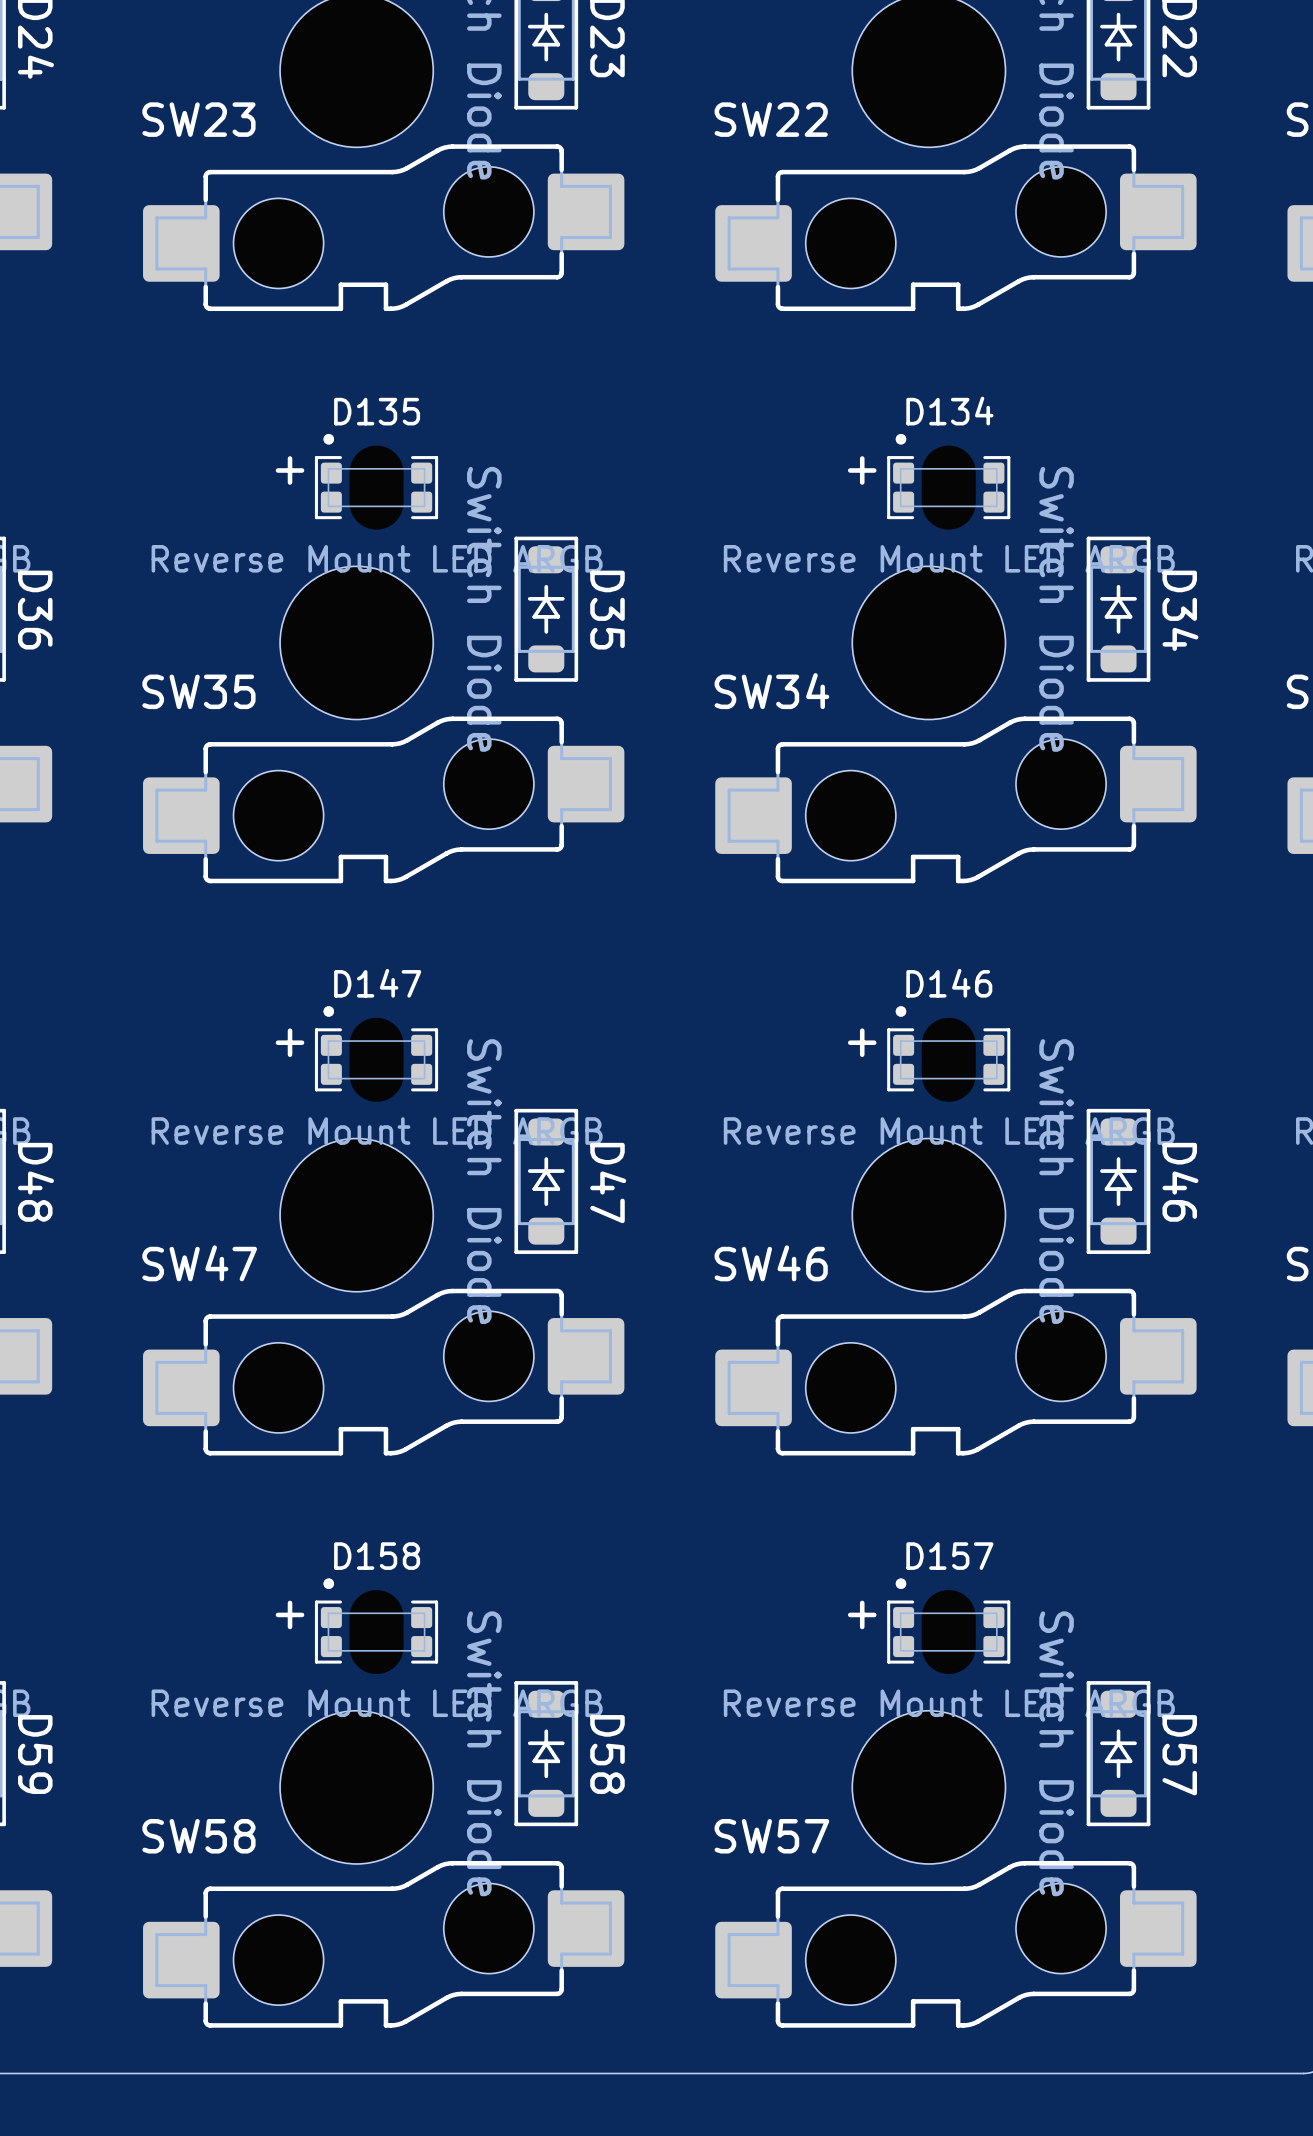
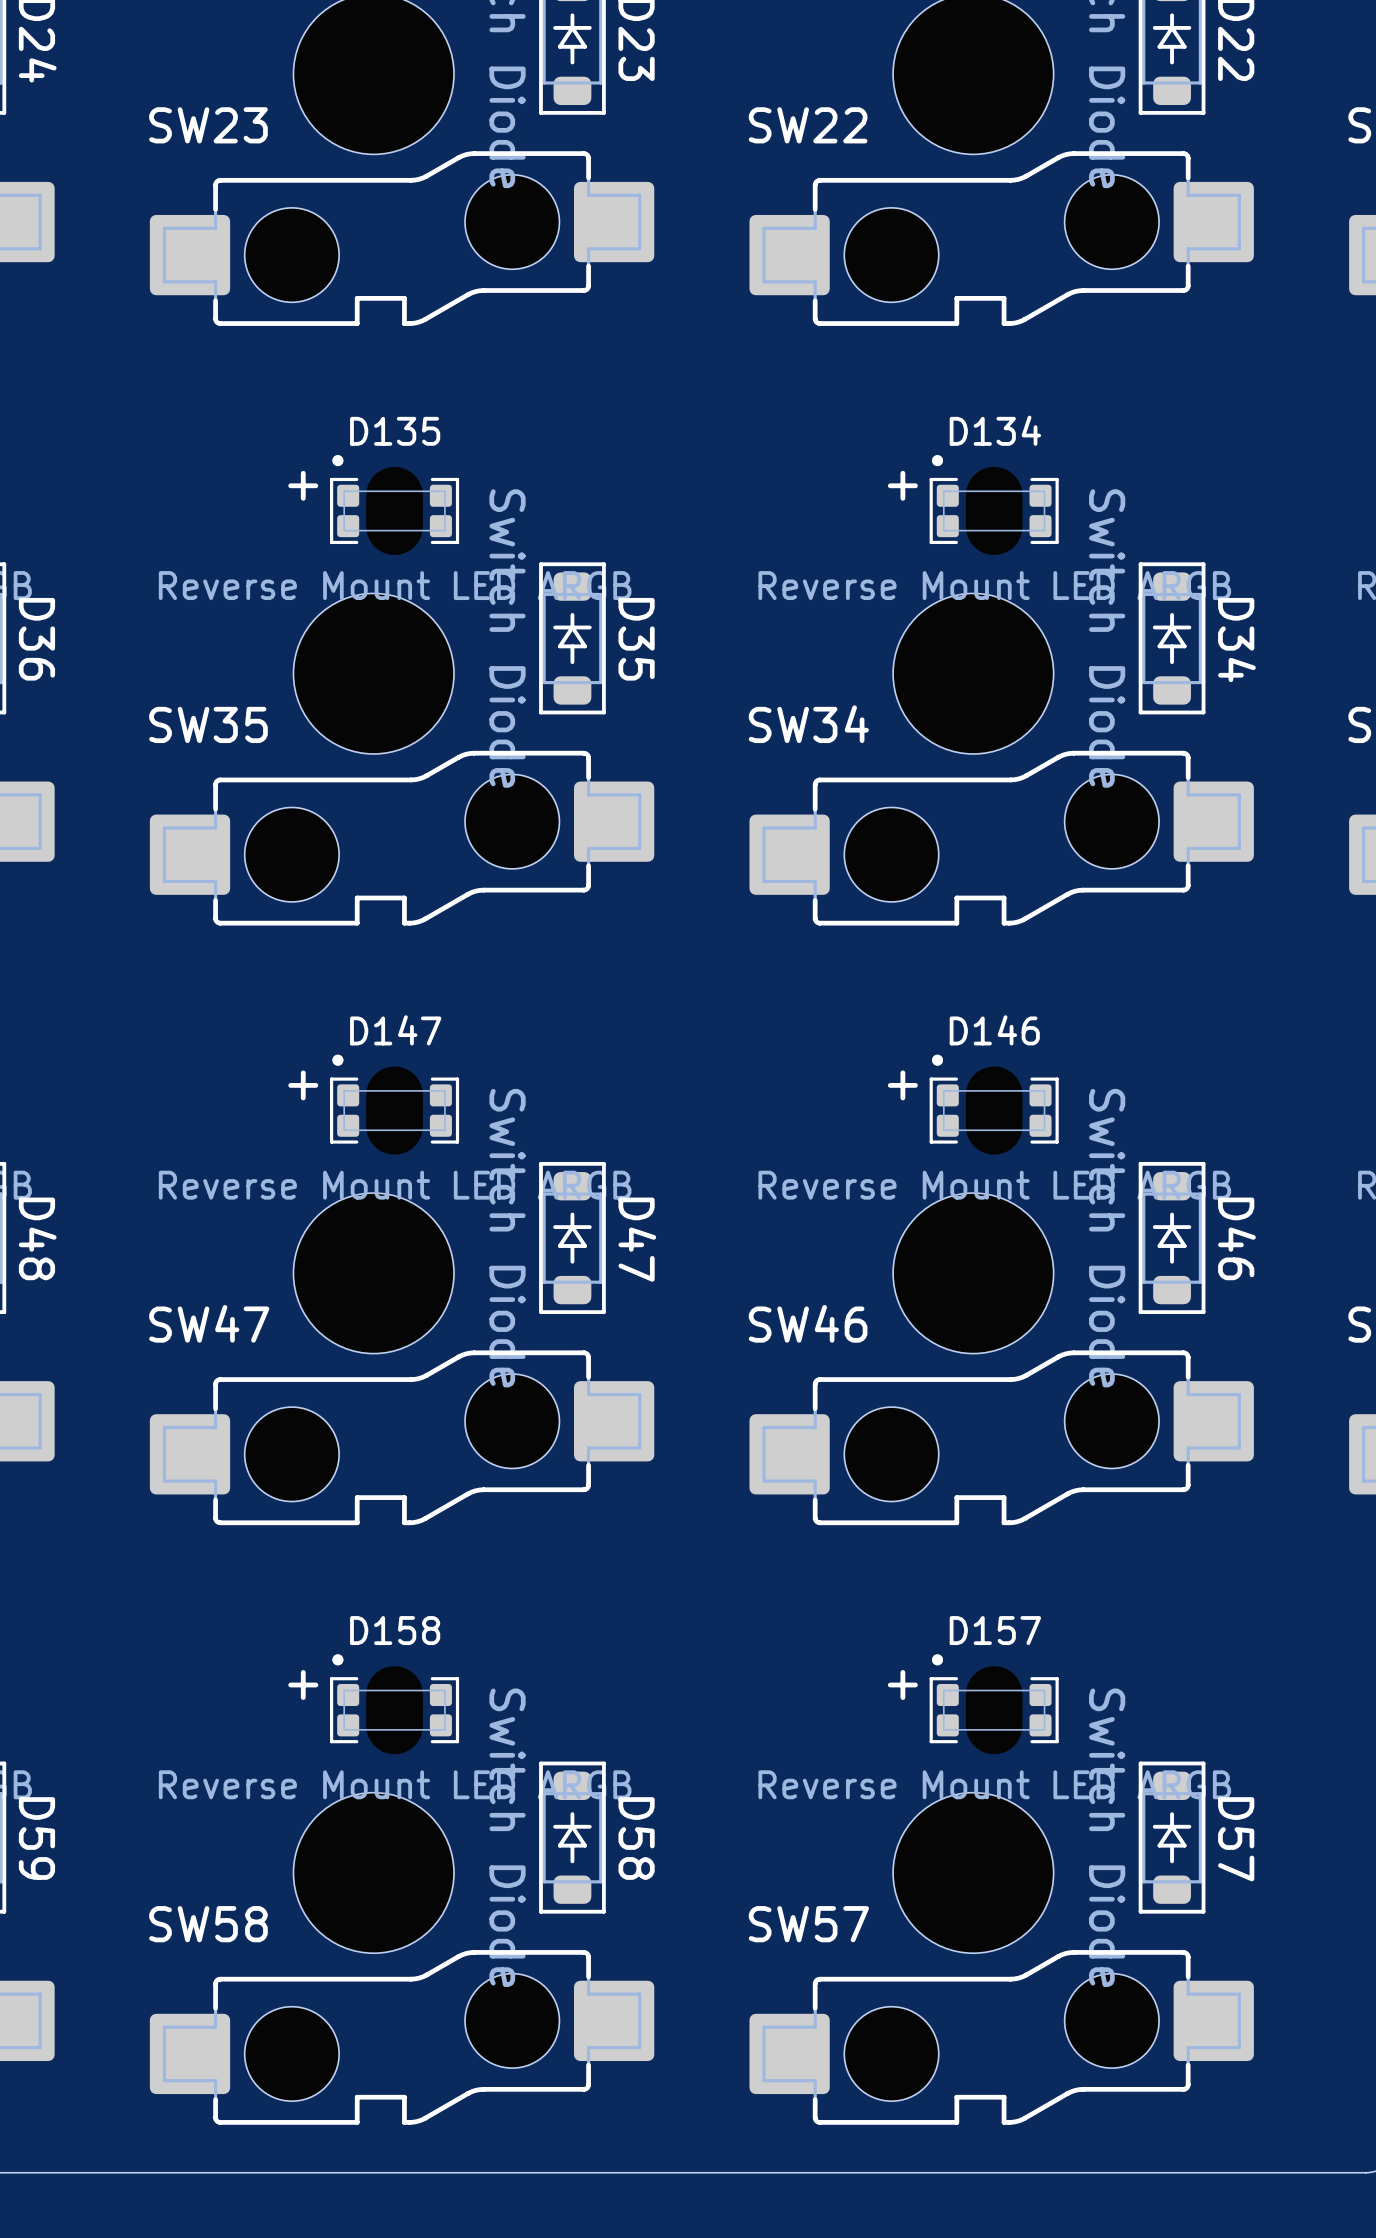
D135 footprint: [275, 434, 439, 530] -> [288, 455, 460, 556]
D134 footprint: [847, 434, 1011, 530] -> [887, 455, 1059, 556]
D147 footprint: [275, 1006, 439, 1102] -> [288, 1054, 460, 1155]
D146 footprint: [847, 1006, 1011, 1102] -> [887, 1054, 1059, 1155]
D158 footprint: [275, 1578, 439, 1675] -> [288, 1654, 460, 1755]
D157 footprint: [847, 1578, 1011, 1675] -> [887, 1654, 1059, 1755]

